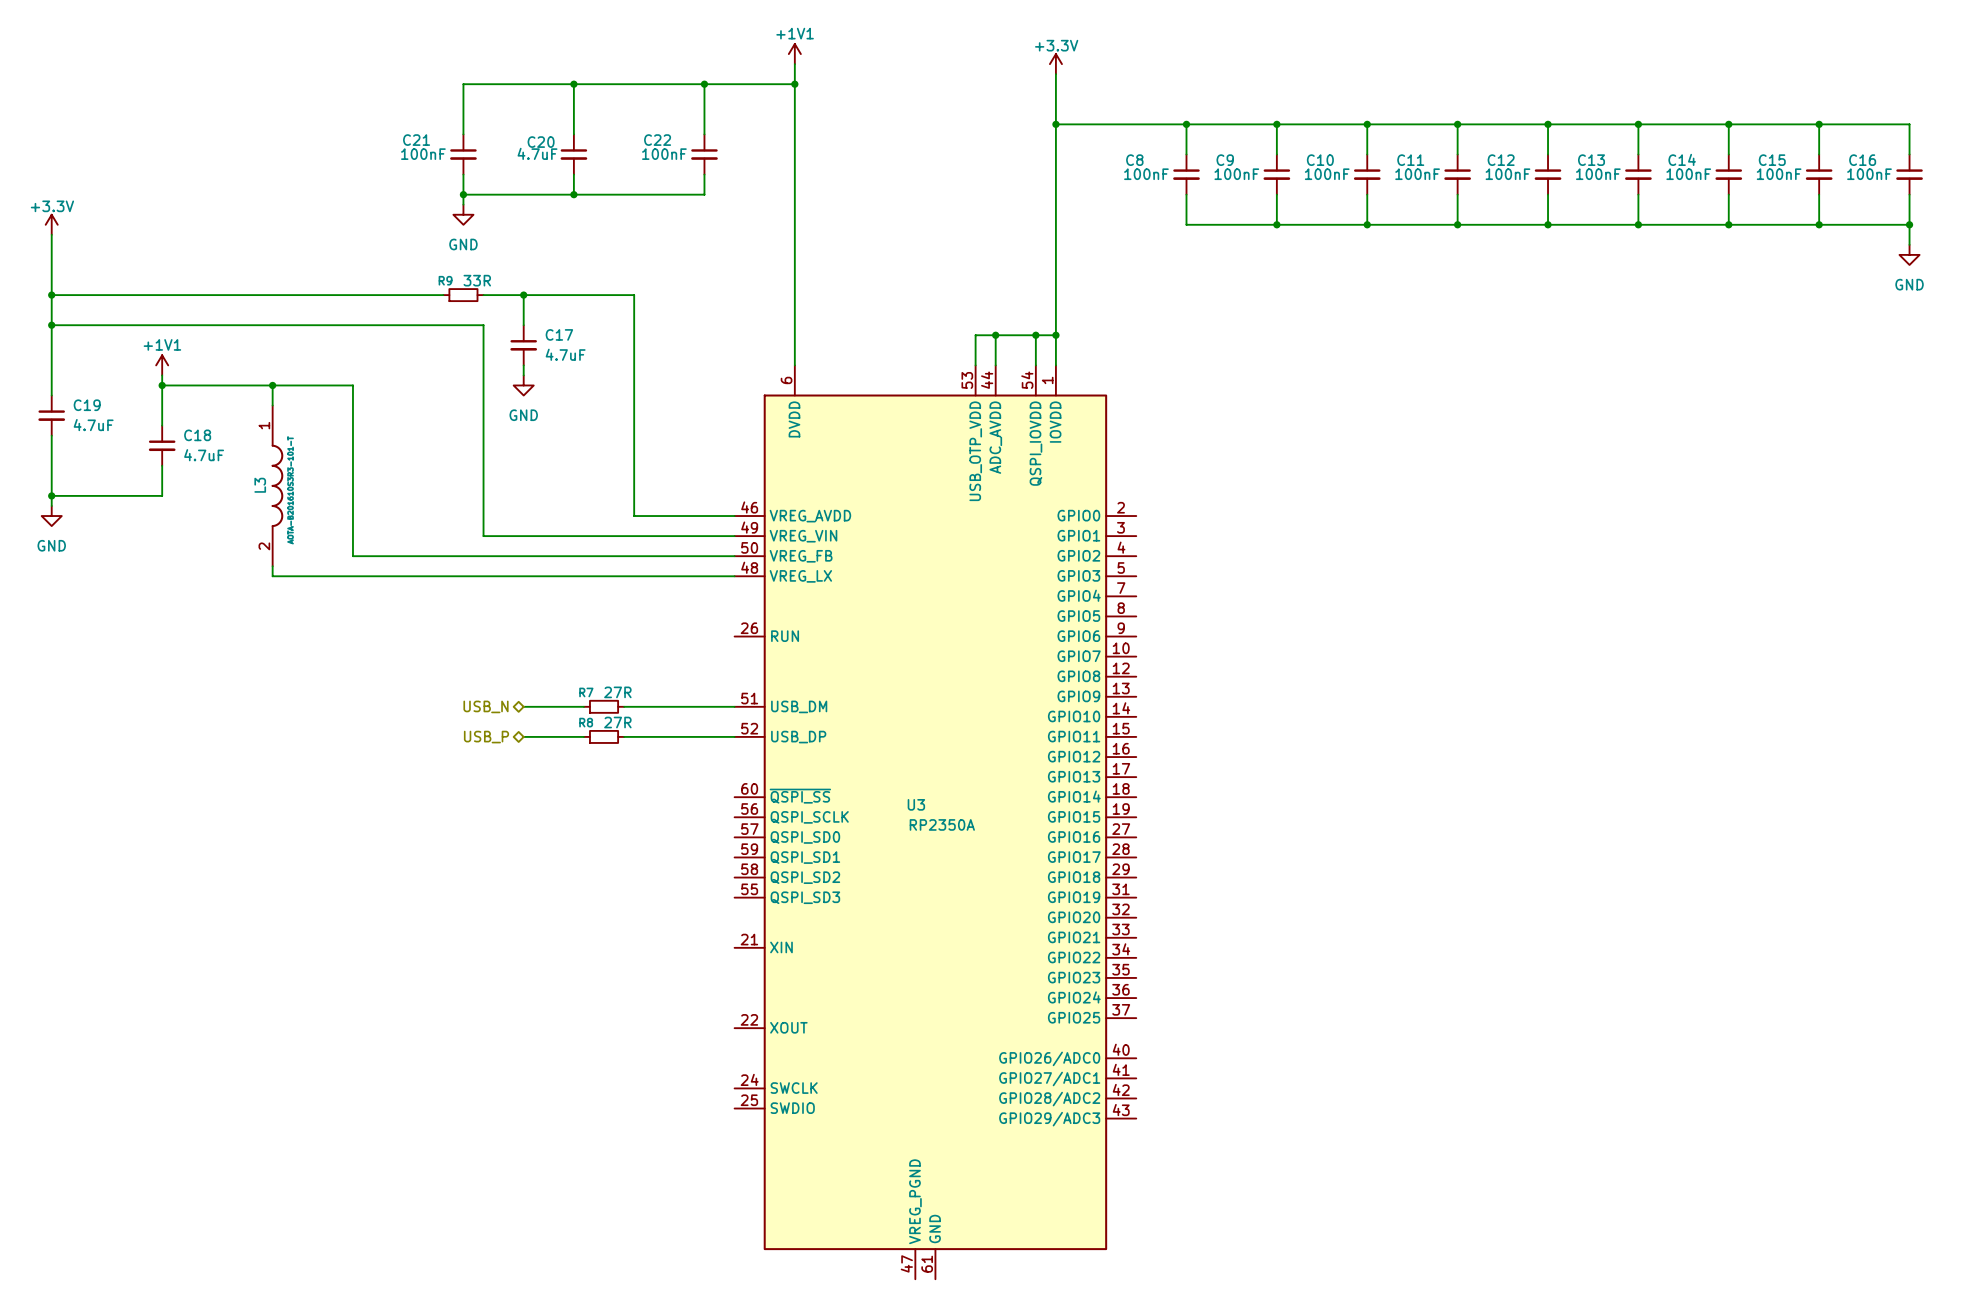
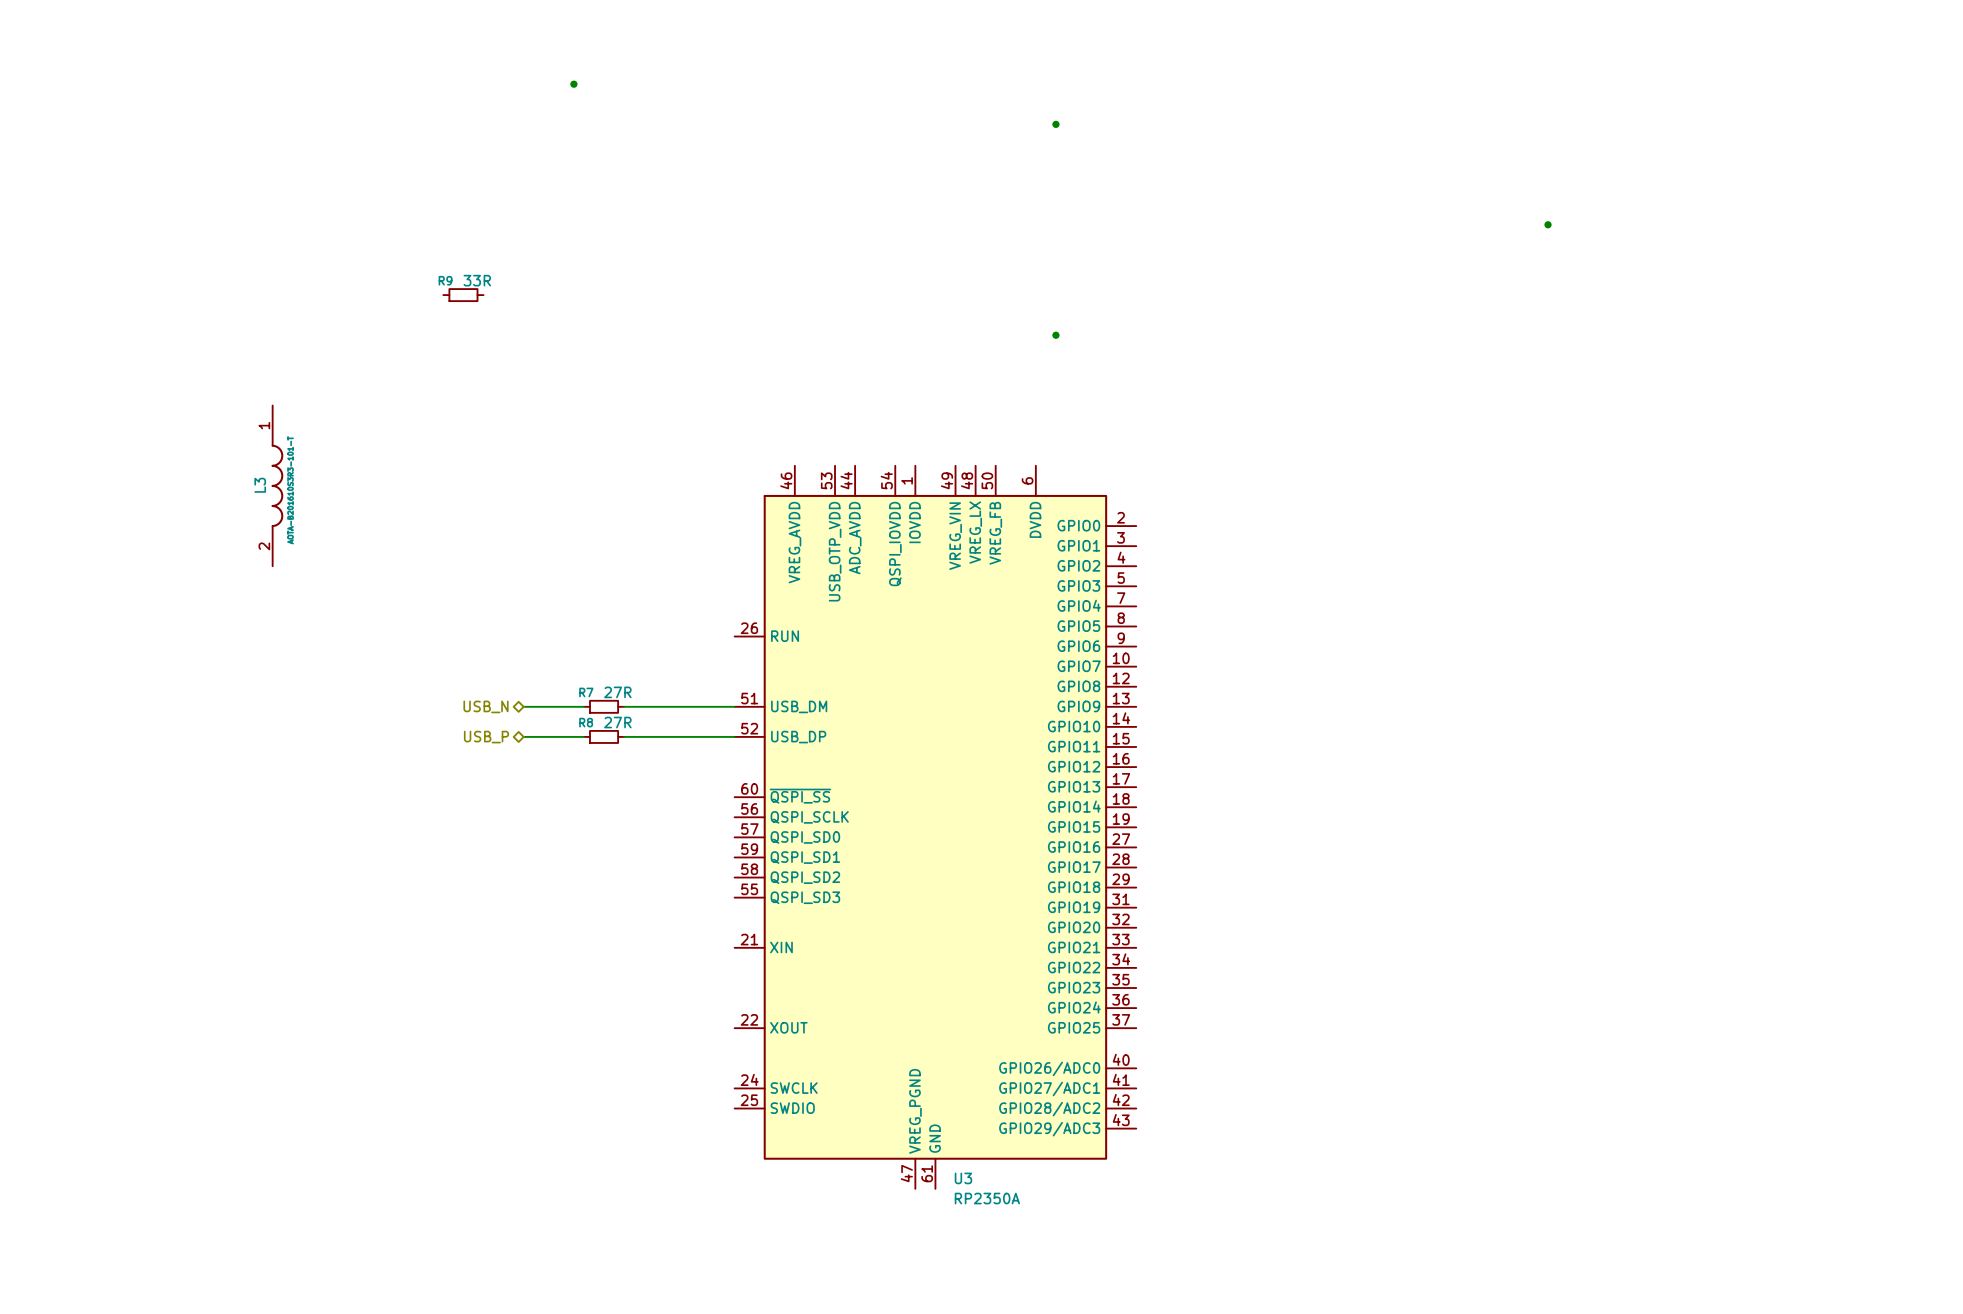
power symbol: +1V1 (794, 54) -> none
wire: (794, 64) (794, 365) -> none
power symbol: +3.3V (1055, 64) -> none
wire: (1055, 74) (1055, 365) -> none
wire: (573, 84) (573, 134) -> none
wire: (704, 84) (704, 134) -> none
junction: (704, 84) -> none
wire: (794, 84) (463, 84) (463, 134) -> none
junction: (794, 84) -> none
wire: (1055, 124) (1909, 124) (1909, 154) -> none
wire: (1186, 124) (1186, 154) -> none
junction: (1186, 124) -> none
wire: (1276, 124) (1276, 154) -> none
junction: (1276, 124) -> none
wire: (1367, 124) (1367, 154) -> none
junction: (1367, 124) -> none
wire: (1457, 124) (1457, 154) -> none
junction: (1457, 124) -> none
wire: (1548, 124) (1548, 154) -> none
junction: (1548, 124) -> none
wire: (1638, 124) (1638, 154) -> none
junction: (1638, 124) -> none
wire: (1728, 124) (1728, 154) -> none
junction: (1728, 124) -> none
wire: (1819, 124) (1819, 154) -> none
junction: (1819, 124) -> none
C21: 100nF (463, 154) -> none
C20: 4.7uF (573, 154) -> none
C22: 100nF (704, 154) -> none
wire: (463, 174) (463, 204) -> none
wire: (573, 174) (573, 194) -> none
wire: (704, 174) (704, 194) (463, 194) -> none
C8: 100nF (1186, 174) -> none
C9: 100nF (1276, 174) -> none
C10: 100nF (1367, 174) -> none
C11: 100nF (1457, 174) -> none
C12: 100nF (1548, 174) -> none
C13: 100nF (1638, 174) -> none
C14: 100nF (1728, 174) -> none
C15: 100nF (1819, 174) -> none
C16: 100nF (1909, 174) -> none
junction: (463, 194) -> none
junction: (573, 194) -> none
wire: (1186, 194) (1186, 224) (1909, 224) -> none
wire: (1276, 194) (1276, 224) -> none
wire: (1367, 194) (1367, 224) -> none
wire: (1457, 194) (1457, 224) -> none
wire: (1548, 194) (1548, 224) -> none
wire: (1638, 194) (1638, 224) -> none
wire: (1728, 194) (1728, 224) -> none
wire: (1819, 194) (1819, 224) -> none
wire: (1909, 194) (1909, 244) -> none
power symbol: GND (463, 214) -> none
power symbol: +3.3V (51, 224) -> none
junction: (1276, 224) -> none
junction: (1367, 224) -> none
junction: (1457, 224) -> none
junction: (1638, 224) -> none
junction: (1728, 224) -> none
junction: (1819, 224) -> none
junction: (1909, 224) -> none
wire: (51, 234) (51, 395) -> none
power symbol: GND (1909, 254) -> none
wire: (51, 295) (443, 295) -> none
junction: (51, 295) -> none
wire: (483, 295) (634, 295) (634, 516) (734, 516) -> none
wire: (523, 295) (523, 325) -> none
junction: (523, 295) -> none
wire: (51, 325) (483, 325) (483, 536) (734, 536) -> none
junction: (51, 325) -> none
wire: (995, 335) (995, 365) -> none
junction: (995, 335) -> none
wire: (1035, 335) (1035, 365) -> none
junction: (1035, 335) -> none
wire: (1055, 335) (975, 335) (975, 365) -> none
C17: 4.7uF (523, 345) -> none
power symbol: +1V1 (162, 365) -> none
wire: (523, 365) (523, 375) -> none
U3 symbol: [734, 365, 1137, 1280] -> [734, 465, 1137, 1189]
wire: (162, 375) (162, 425) -> none
wire: (162, 385) (352, 385) (352, 556) (734, 556) -> none
junction: (162, 385) -> none
wire: (272, 385) (272, 405) -> none
junction: (272, 385) -> none
power symbol: GND (523, 385) -> none
C19: 4.7uF (51, 415) -> none
wire: (51, 435) (51, 505) -> none
C18: 4.7uF (162, 445) -> none
wire: (162, 465) (162, 495) (51, 495) -> none
junction: (51, 495) -> none
power symbol: GND (51, 516) -> none
wire: (272, 566) (272, 576) (734, 576) -> none
U3 name position: U3 (916, 804) -> U3 (963, 1178)
U3 value position: RP2350A (942, 824) -> RP2350A (987, 1198)

